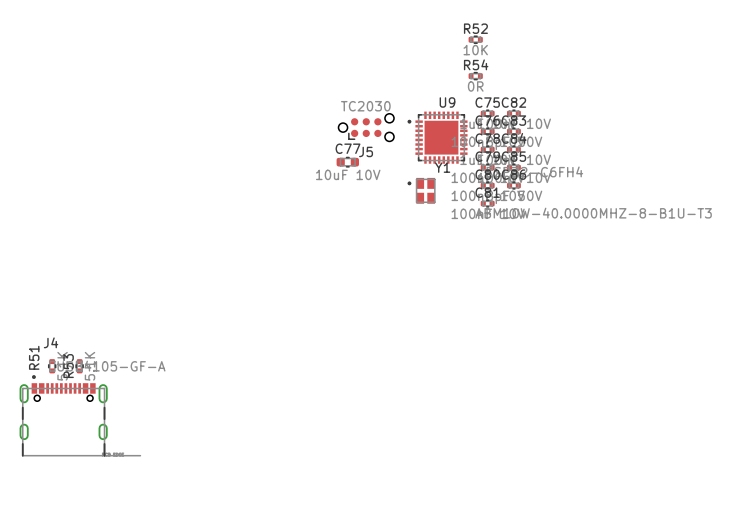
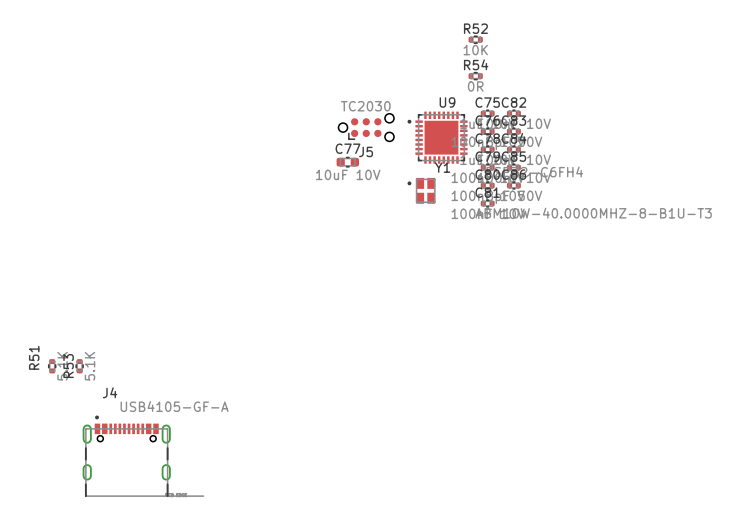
J4 name position: J4 (51, 342) -> J4 (110, 392)
J4 position: (80, 415) -> (143, 456)

